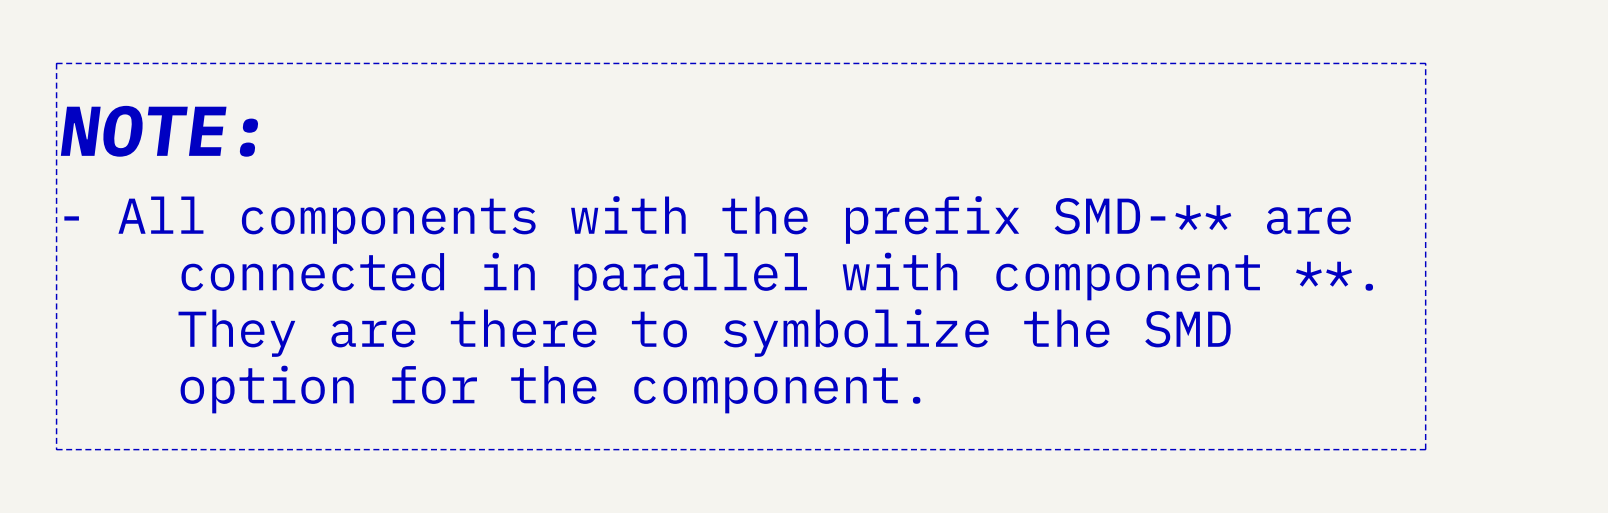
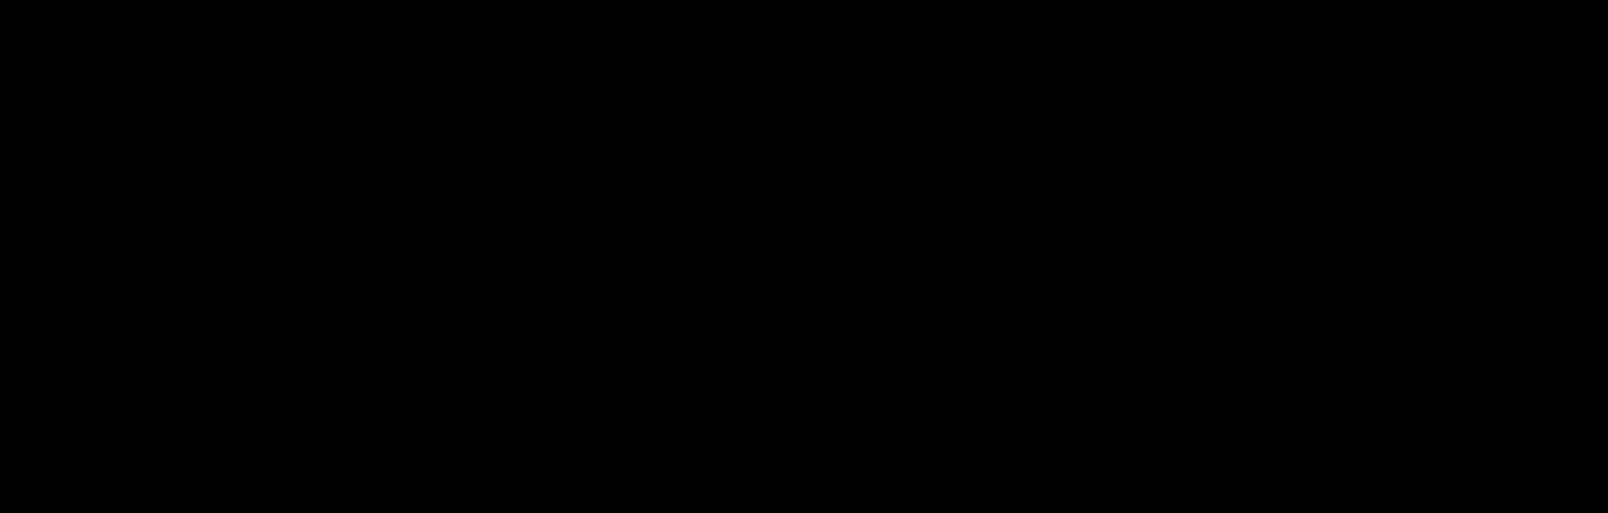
line: (56, 63) (56, 449) (1425, 449) (1425, 63) (56, 63) -> none
text: NOTE: (159, 131) -> none
text: - All components with the prefix SMD-** are (707, 219) -> none
text: connected in parallel with component **. (777, 276) -> none
text: They are there to symbolize the SMD (704, 333) -> none
text: option for the component. (550, 389) -> none

